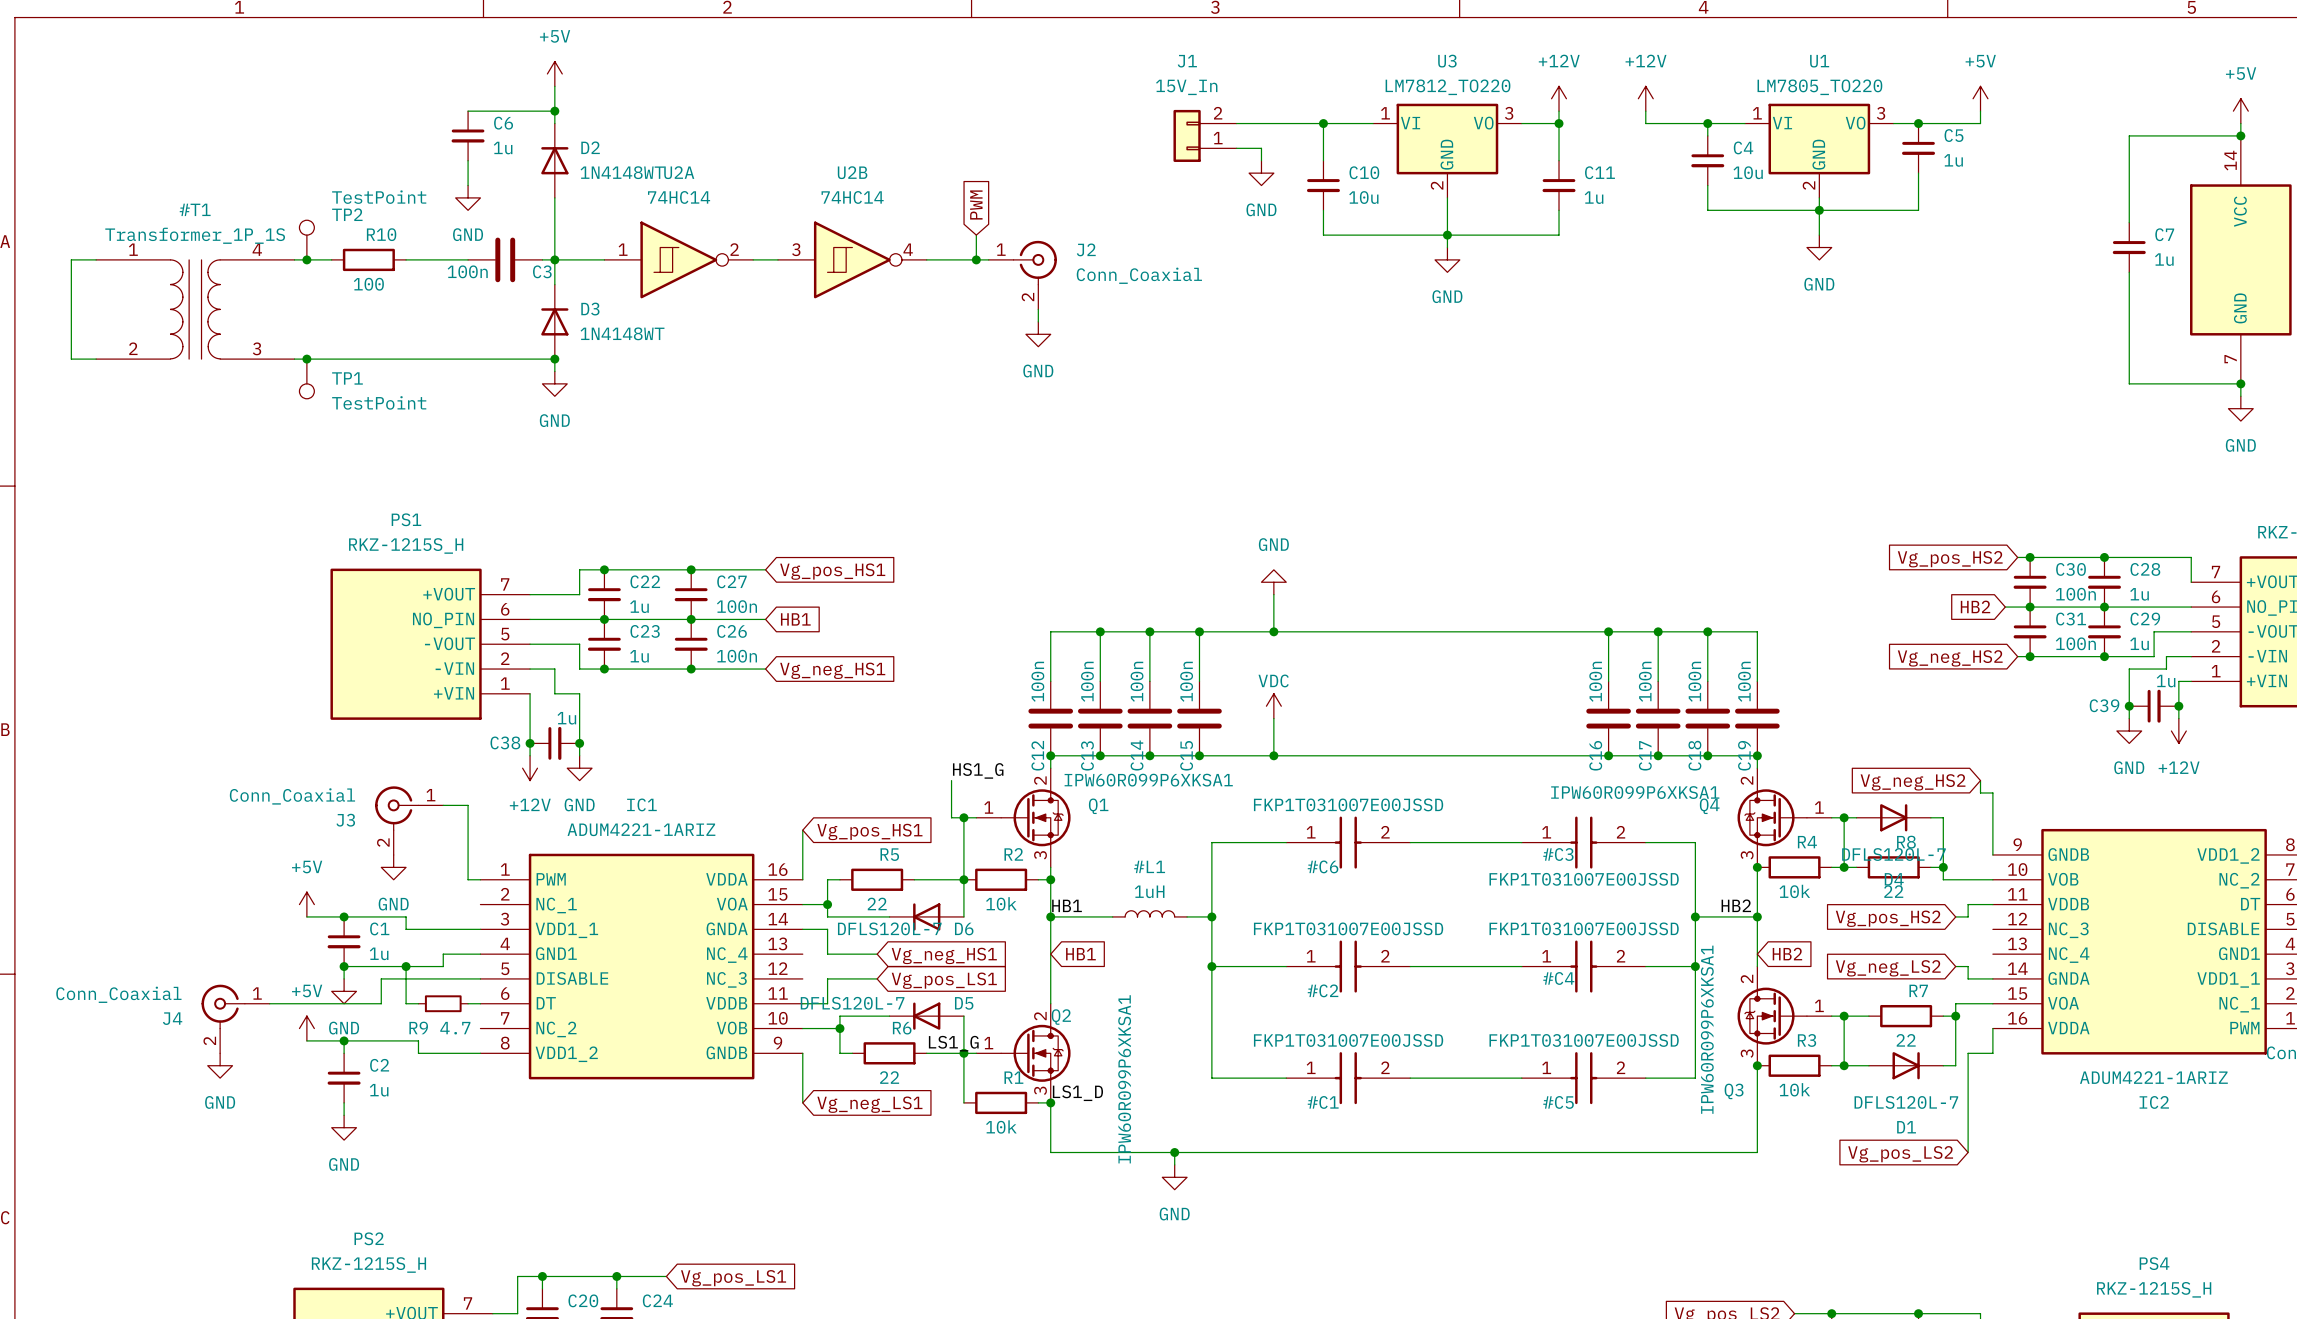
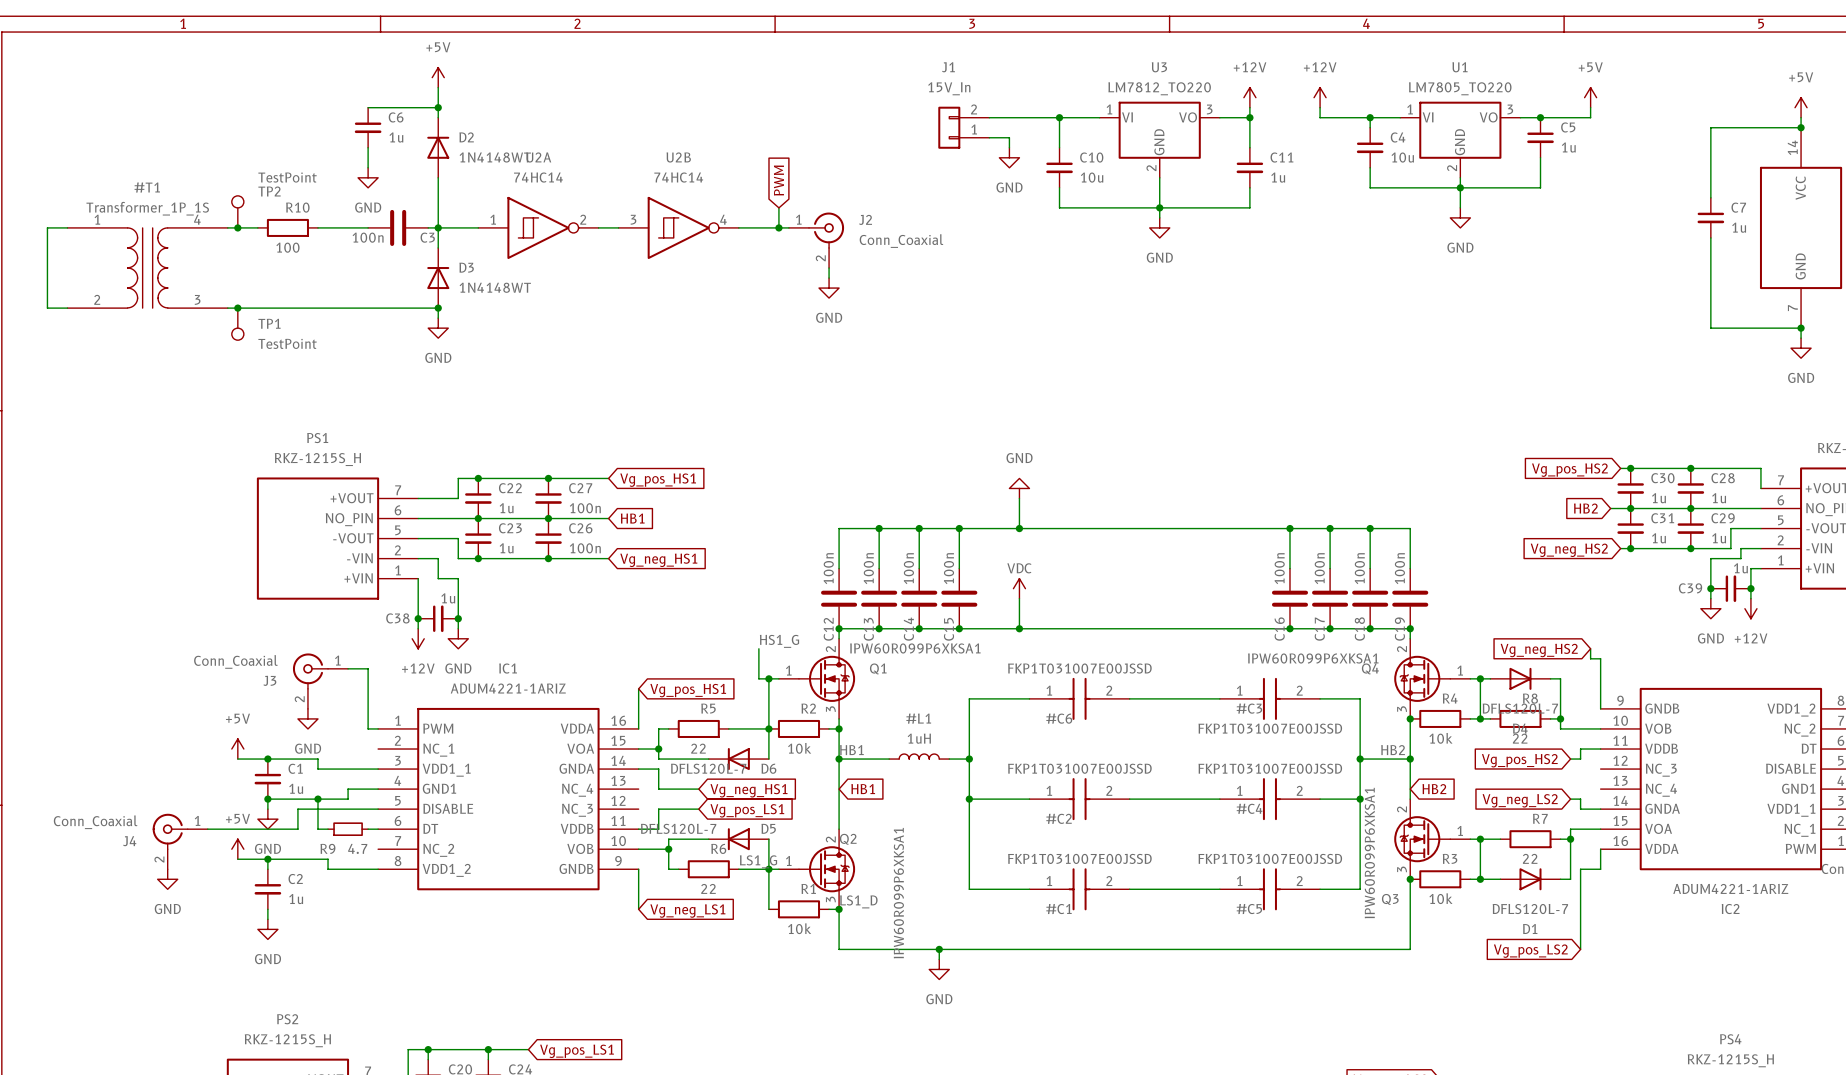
C30 value: 100n (2075, 594) -> 1u (1658, 498)
C31 value: 100n (2075, 643) -> 1u (1658, 538)

